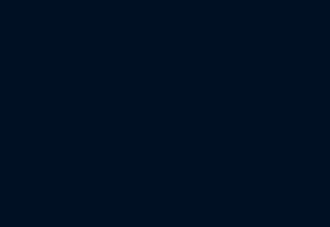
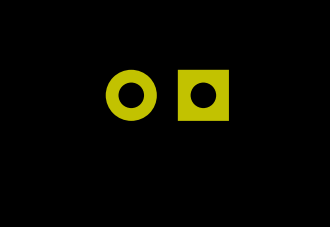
part: none -> (167, 95)

